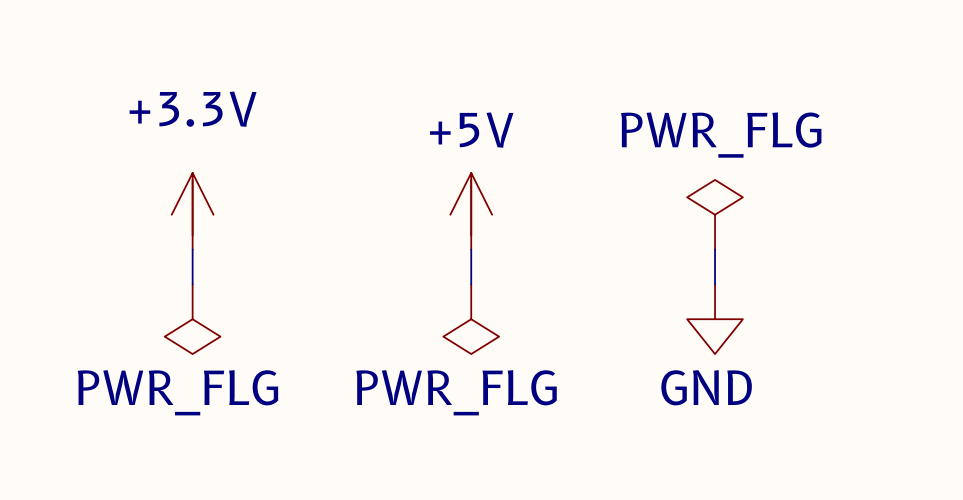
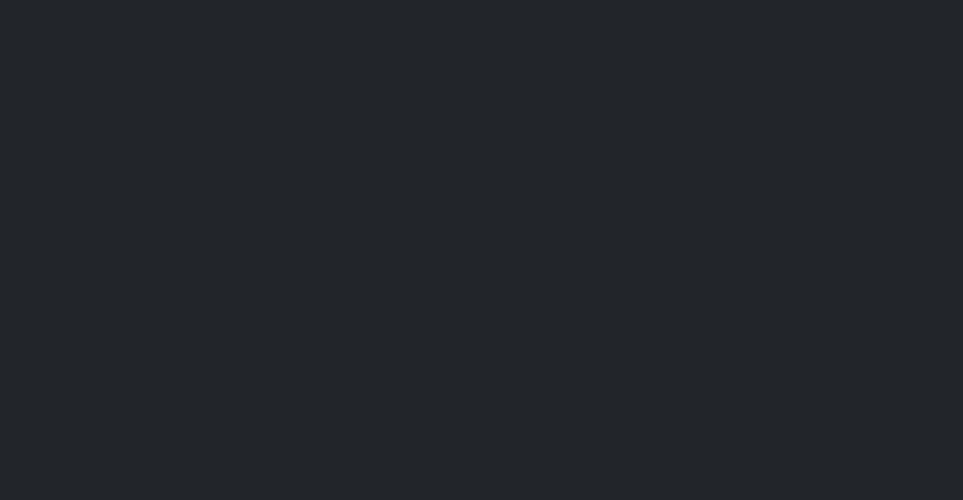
power symbol: +3.3V (192, 211) -> none
power symbol: +5V (471, 211) -> none
power symbol: PWR_FLG (715, 214) -> none
wire: (192, 249) (192, 284) -> none
wire: (471, 249) (471, 284) -> none
wire: (715, 249) (715, 284) -> none
power symbol: PWR_FLG (192, 319) -> none
power symbol: PWR_FLG (471, 319) -> none
power symbol: GND (715, 319) -> none

